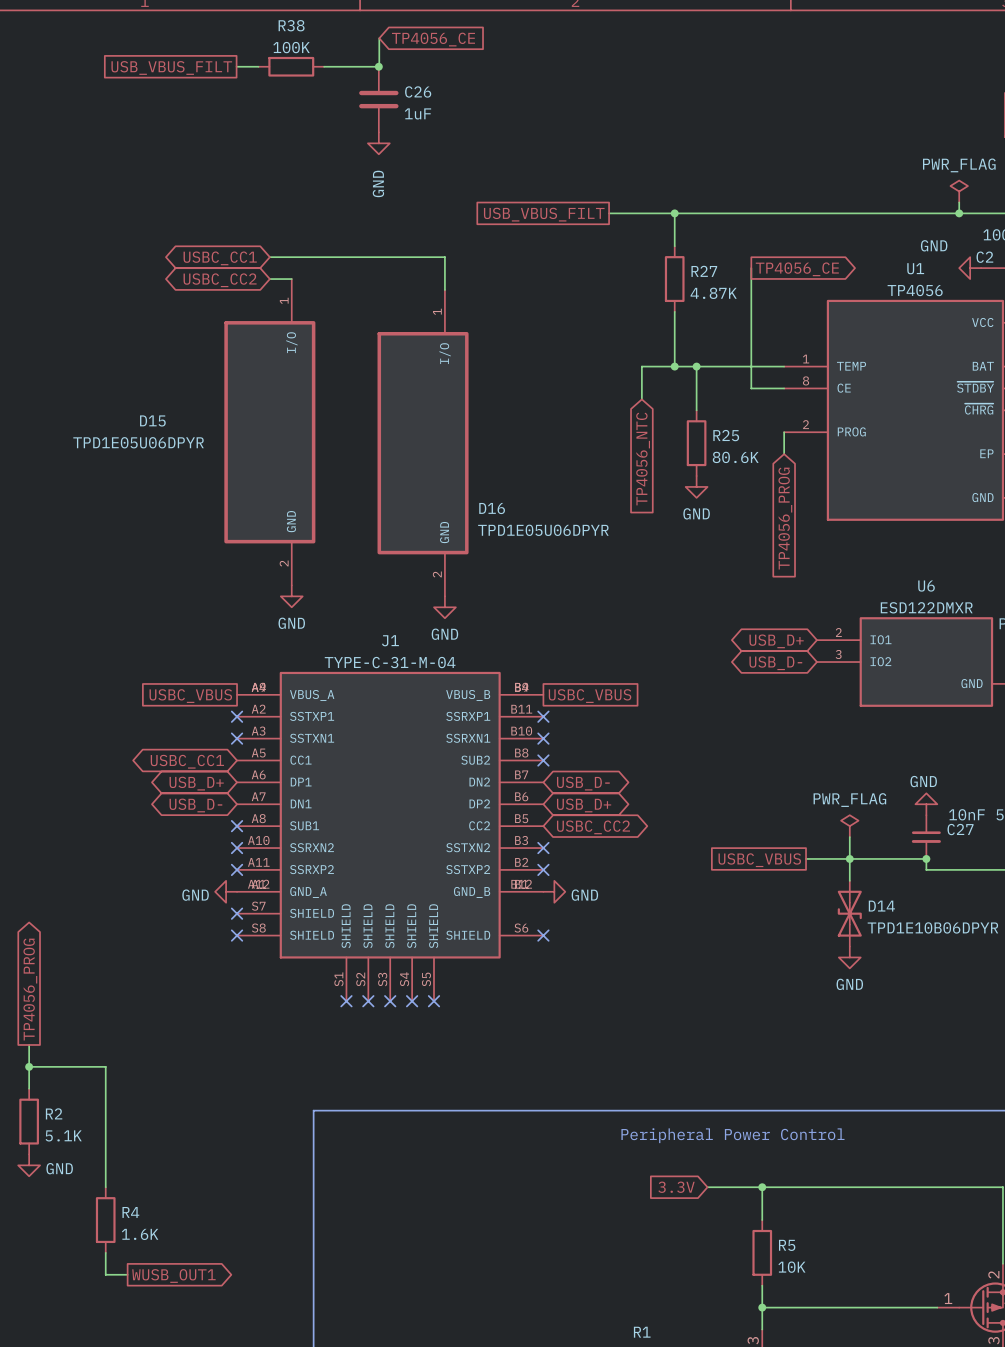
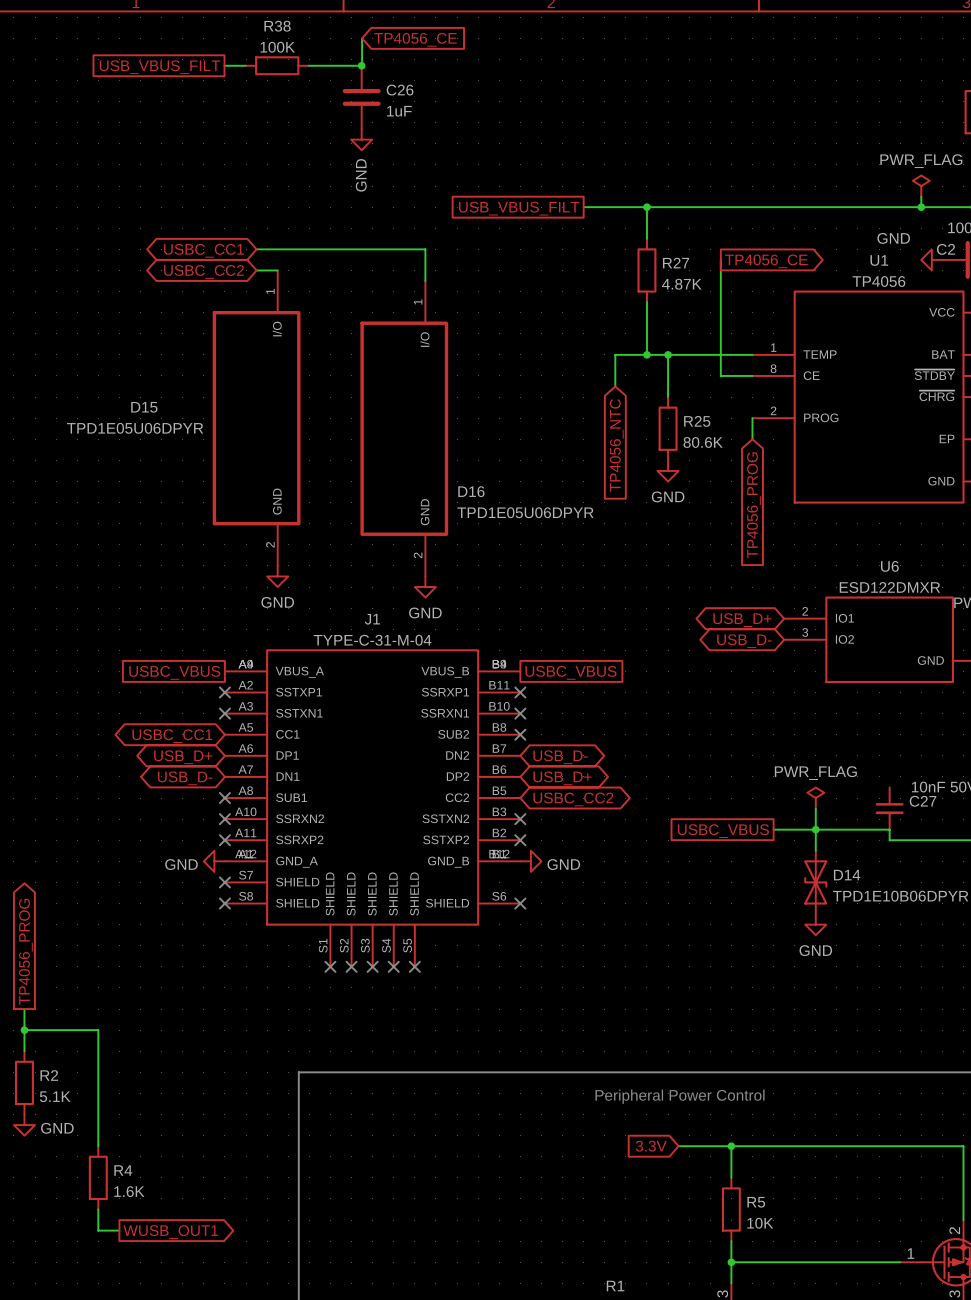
power symbol: GND (926, 804) -> none
junction: (926, 858) -> none

